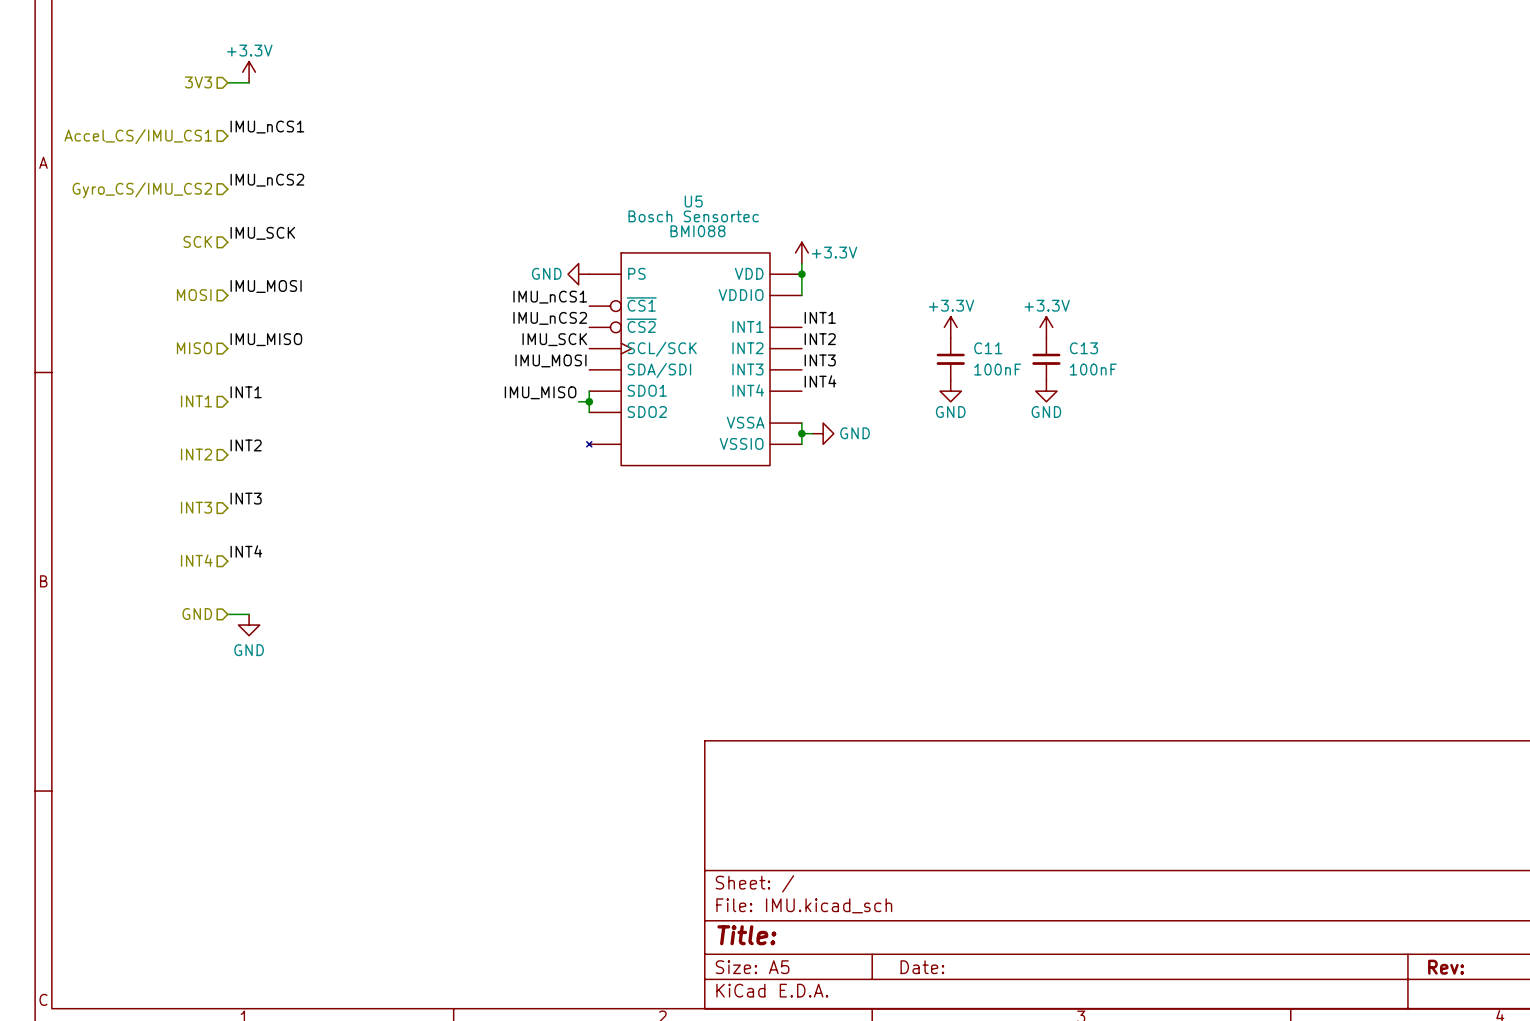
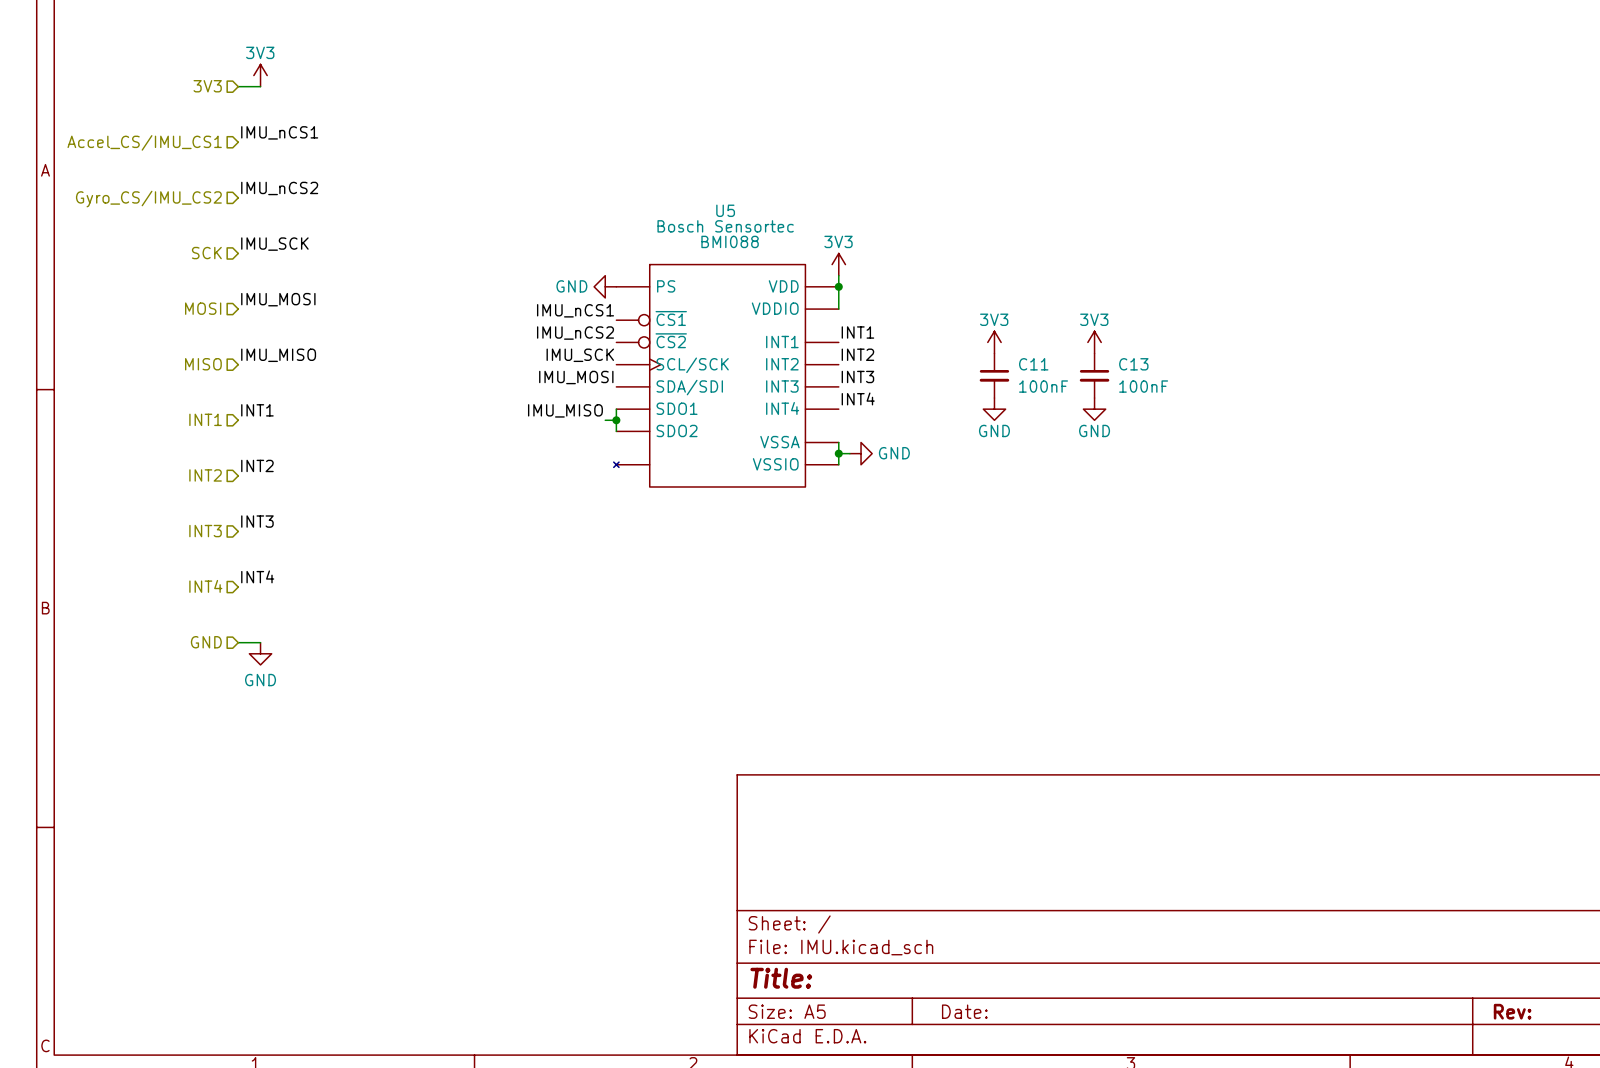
power symbol: +3.3V (249, 72) -> 3V3 (260, 75)
power symbol: +3.3V (801, 252) -> 3V3 (838, 264)
power symbol: +3.3V (950, 327) -> 3V3 (994, 342)
power symbol: +3.3V (1046, 327) -> 3V3 (1094, 342)

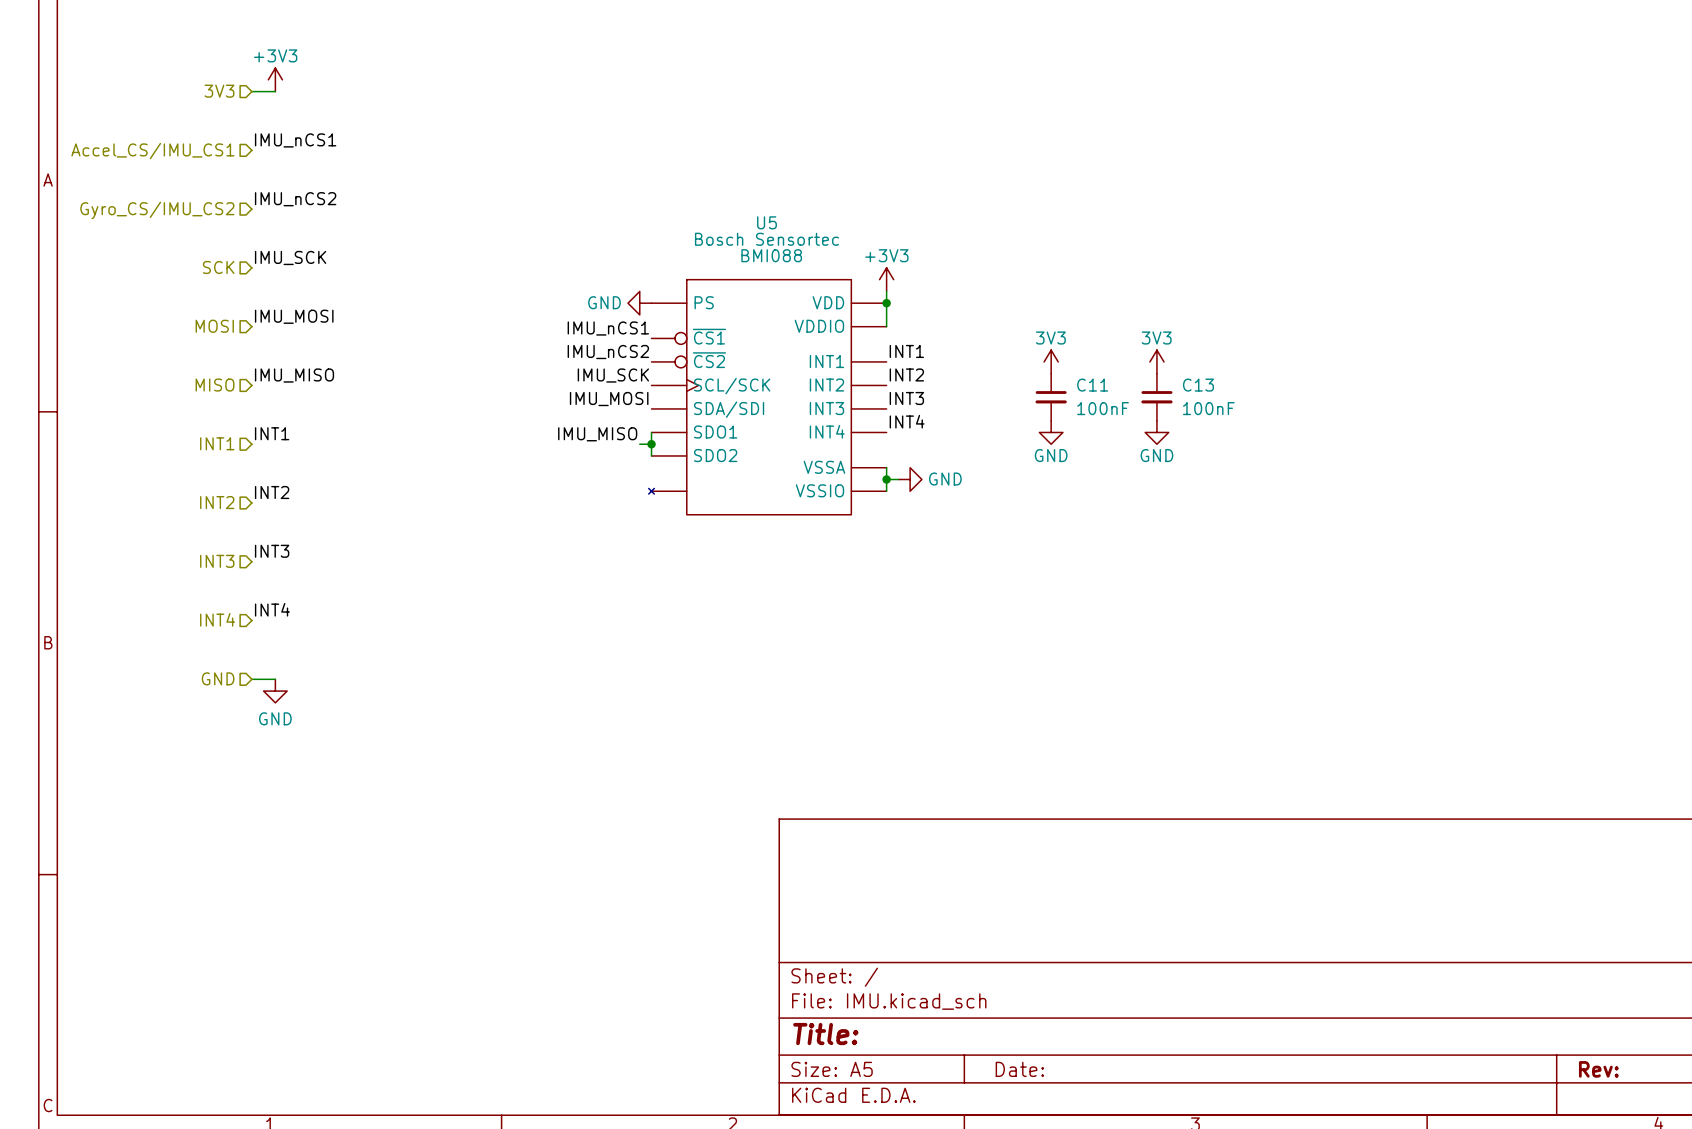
power symbol: 3V3 (260, 75) -> +3V3 (275, 79)
power symbol: 3V3 (838, 264) -> +3V3 (886, 279)

